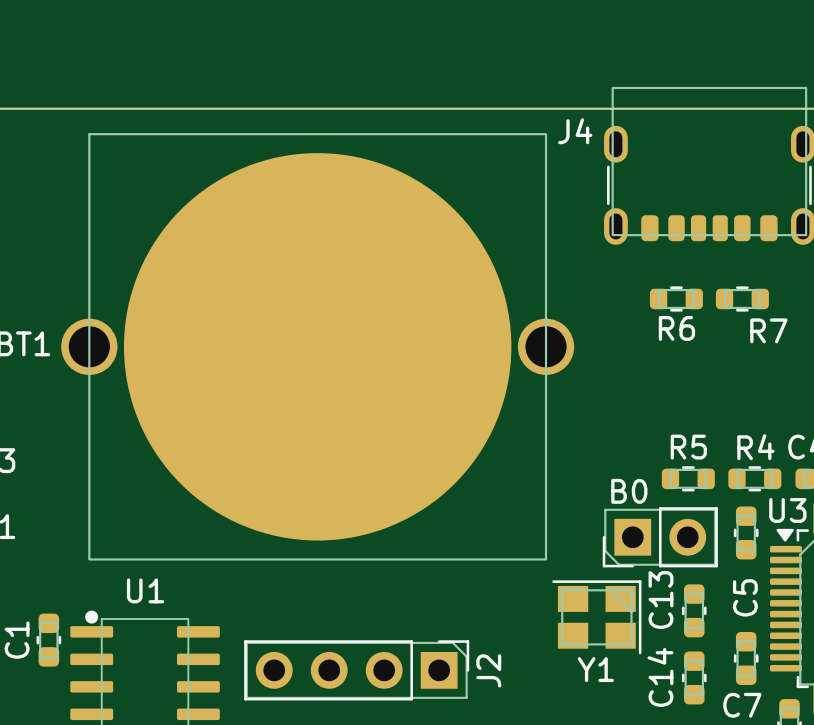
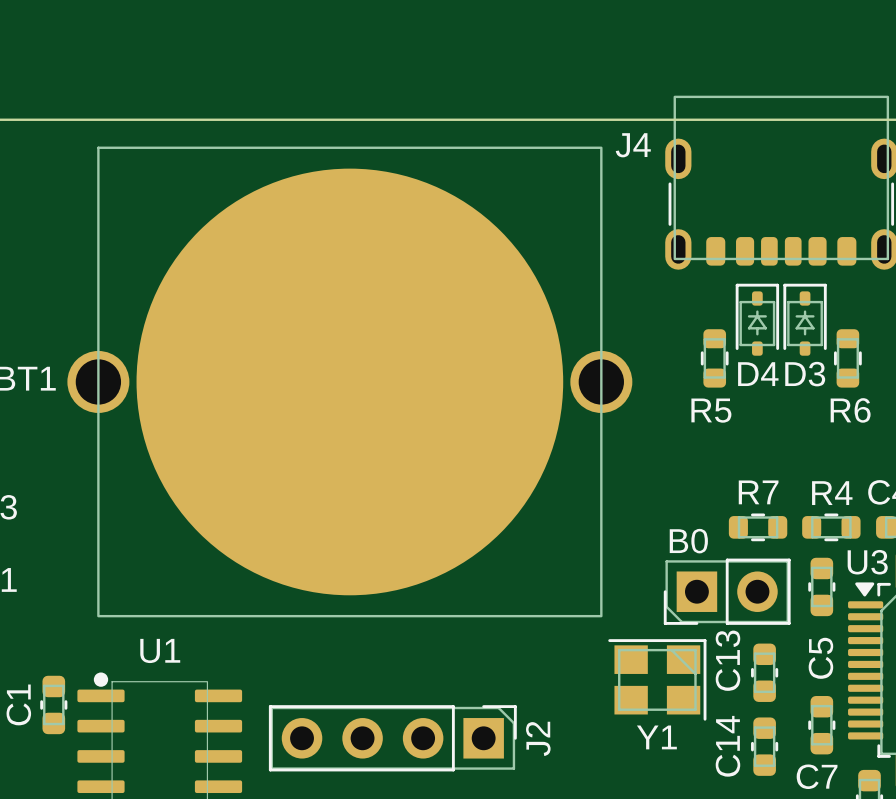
D4: none -> (757, 319)
D3: none -> (805, 319)
R6 rotation: 0° (676, 298) -> 90° clockwise (847, 358)
R6 position: (676, 298) -> (847, 358)
R7: (742, 298) -> none
R5: none -> (714, 358)
R5 name: R5 (688, 447) -> R7 (758, 492)

